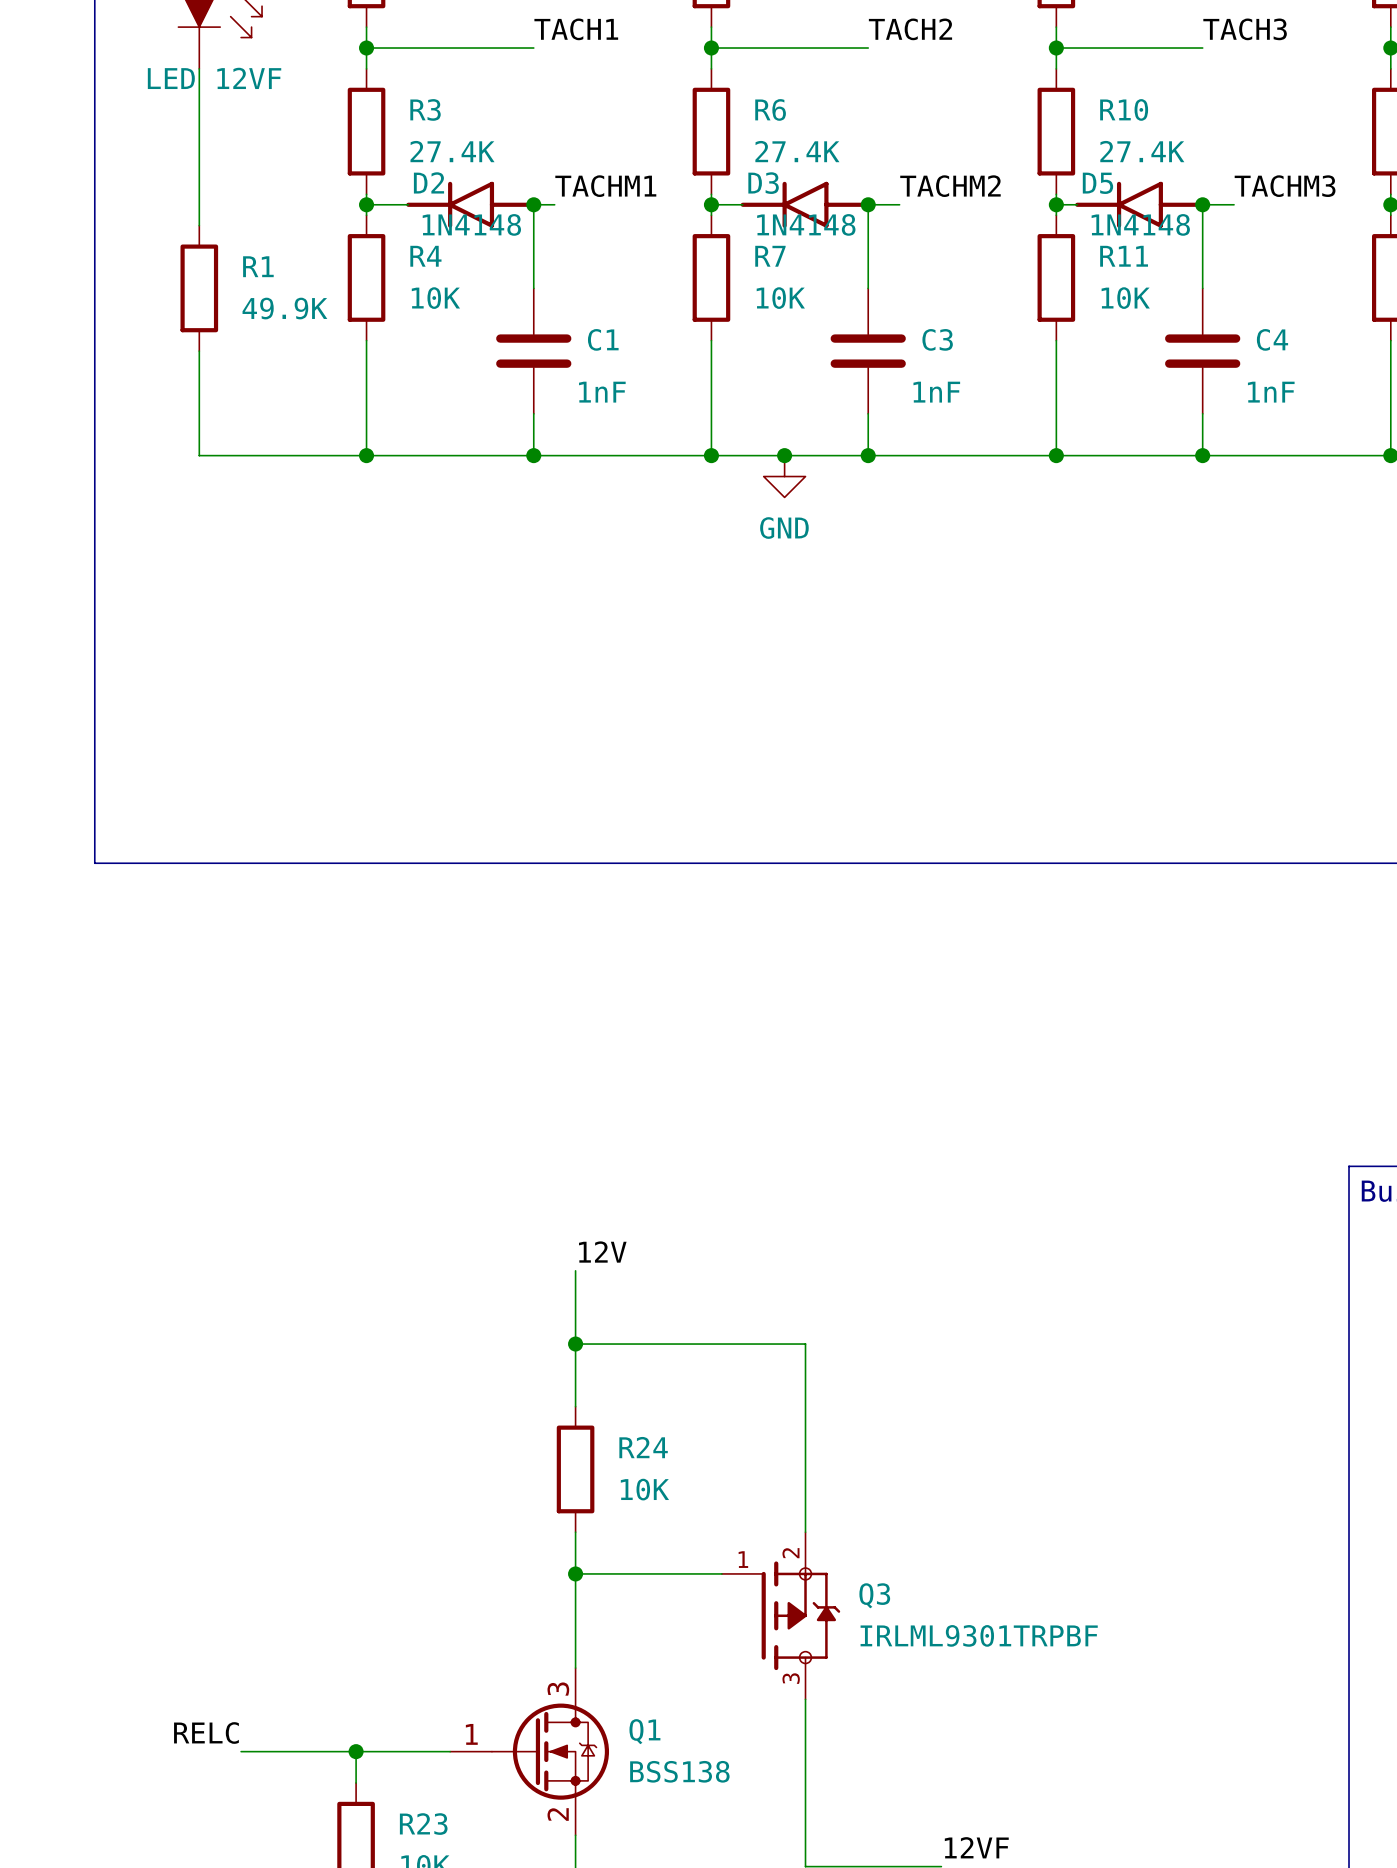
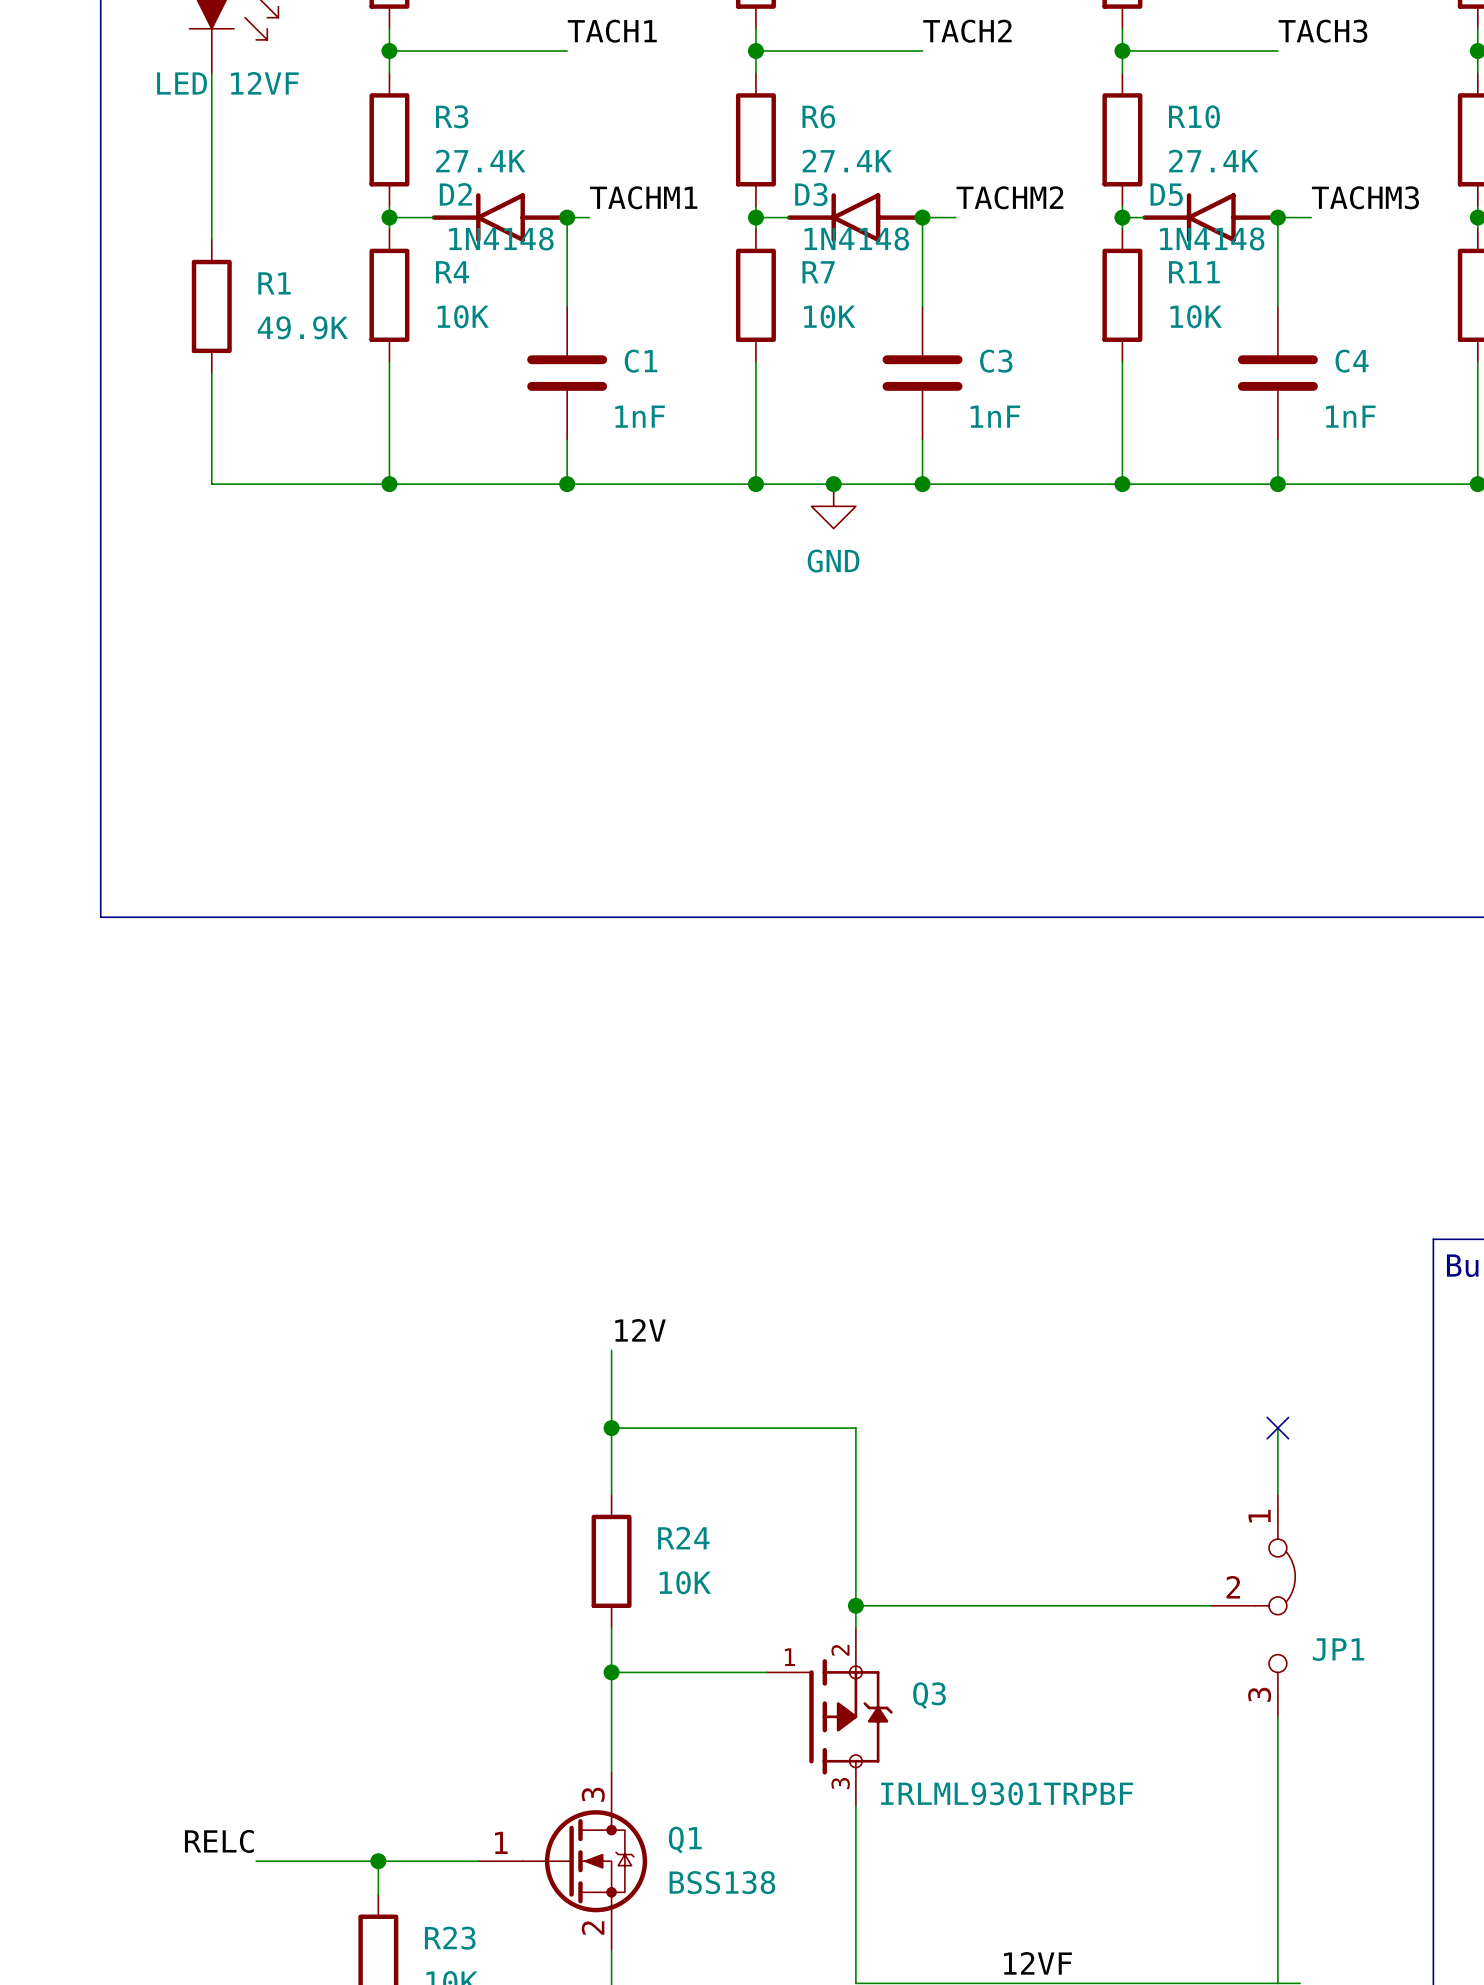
wire: none -> (1277, 1428) (1277, 1494)
no-connect mark: none -> (1277, 1428)
wire: none -> (855, 1605) (1211, 1605)
junction: none -> (855, 1605)
JP1: none -> (1253, 1605)
wire: none -> (1277, 1716) (1277, 1983)
Q3 value position: IRLML9301TRPBF (979, 1635) -> IRLML9301TRPBF (1007, 1793)
wire: none -> (1000, 1983) (1300, 1983)

